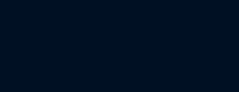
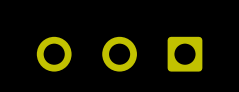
part: none -> (119, 54)

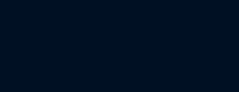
part: (119, 54) -> none

